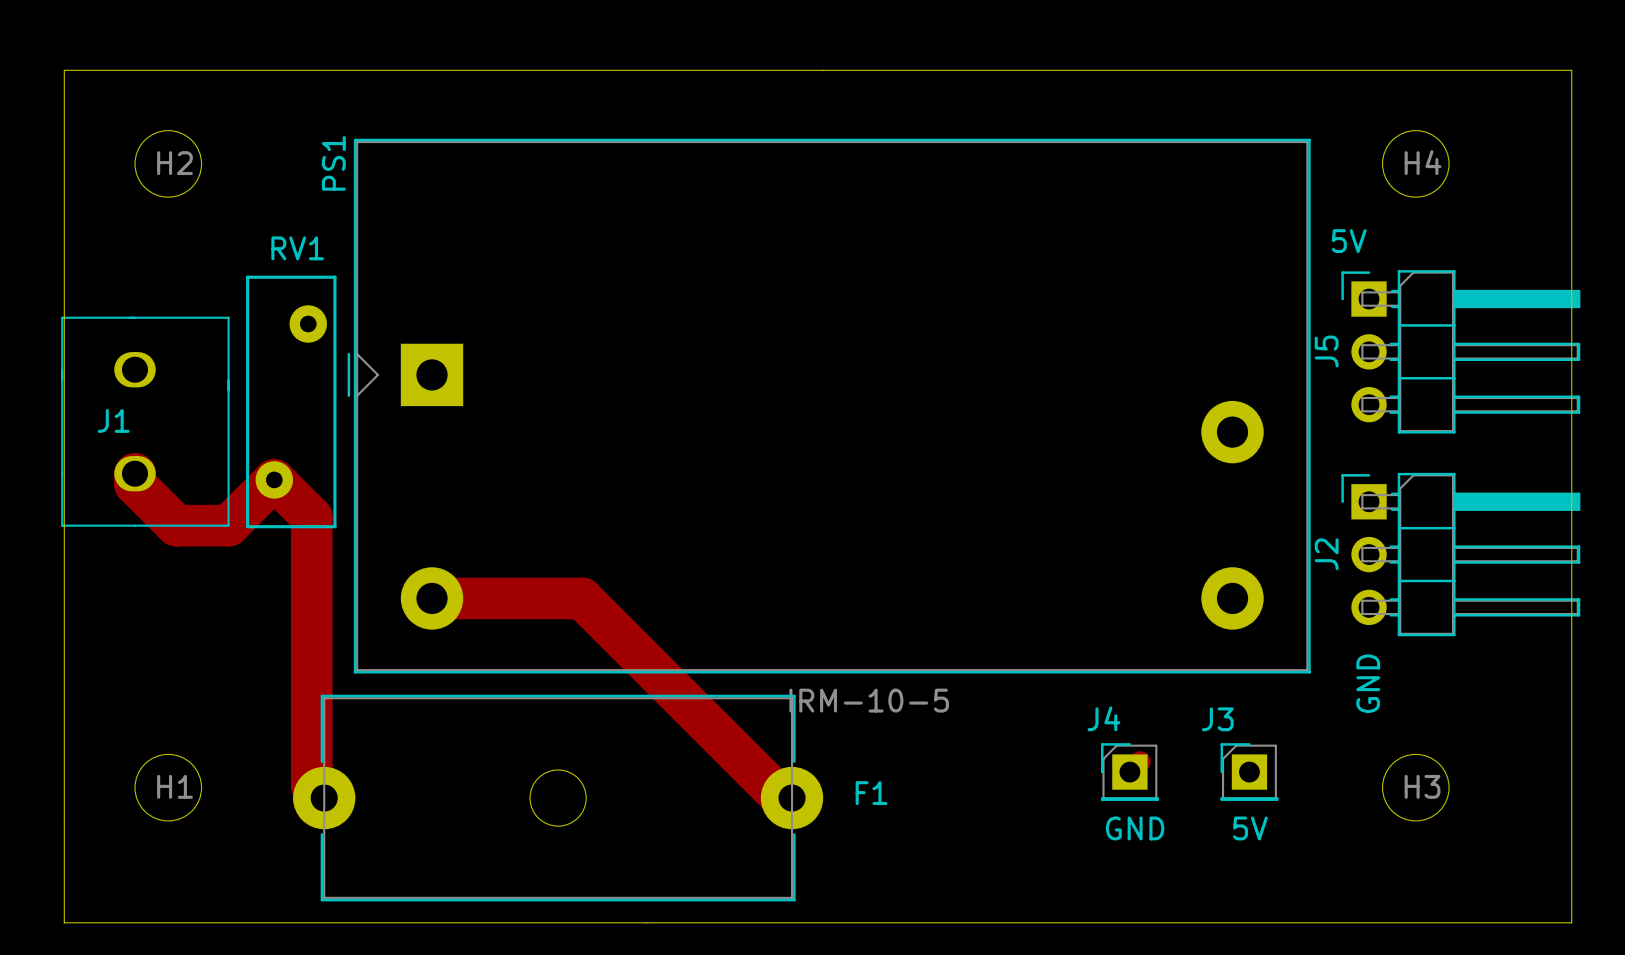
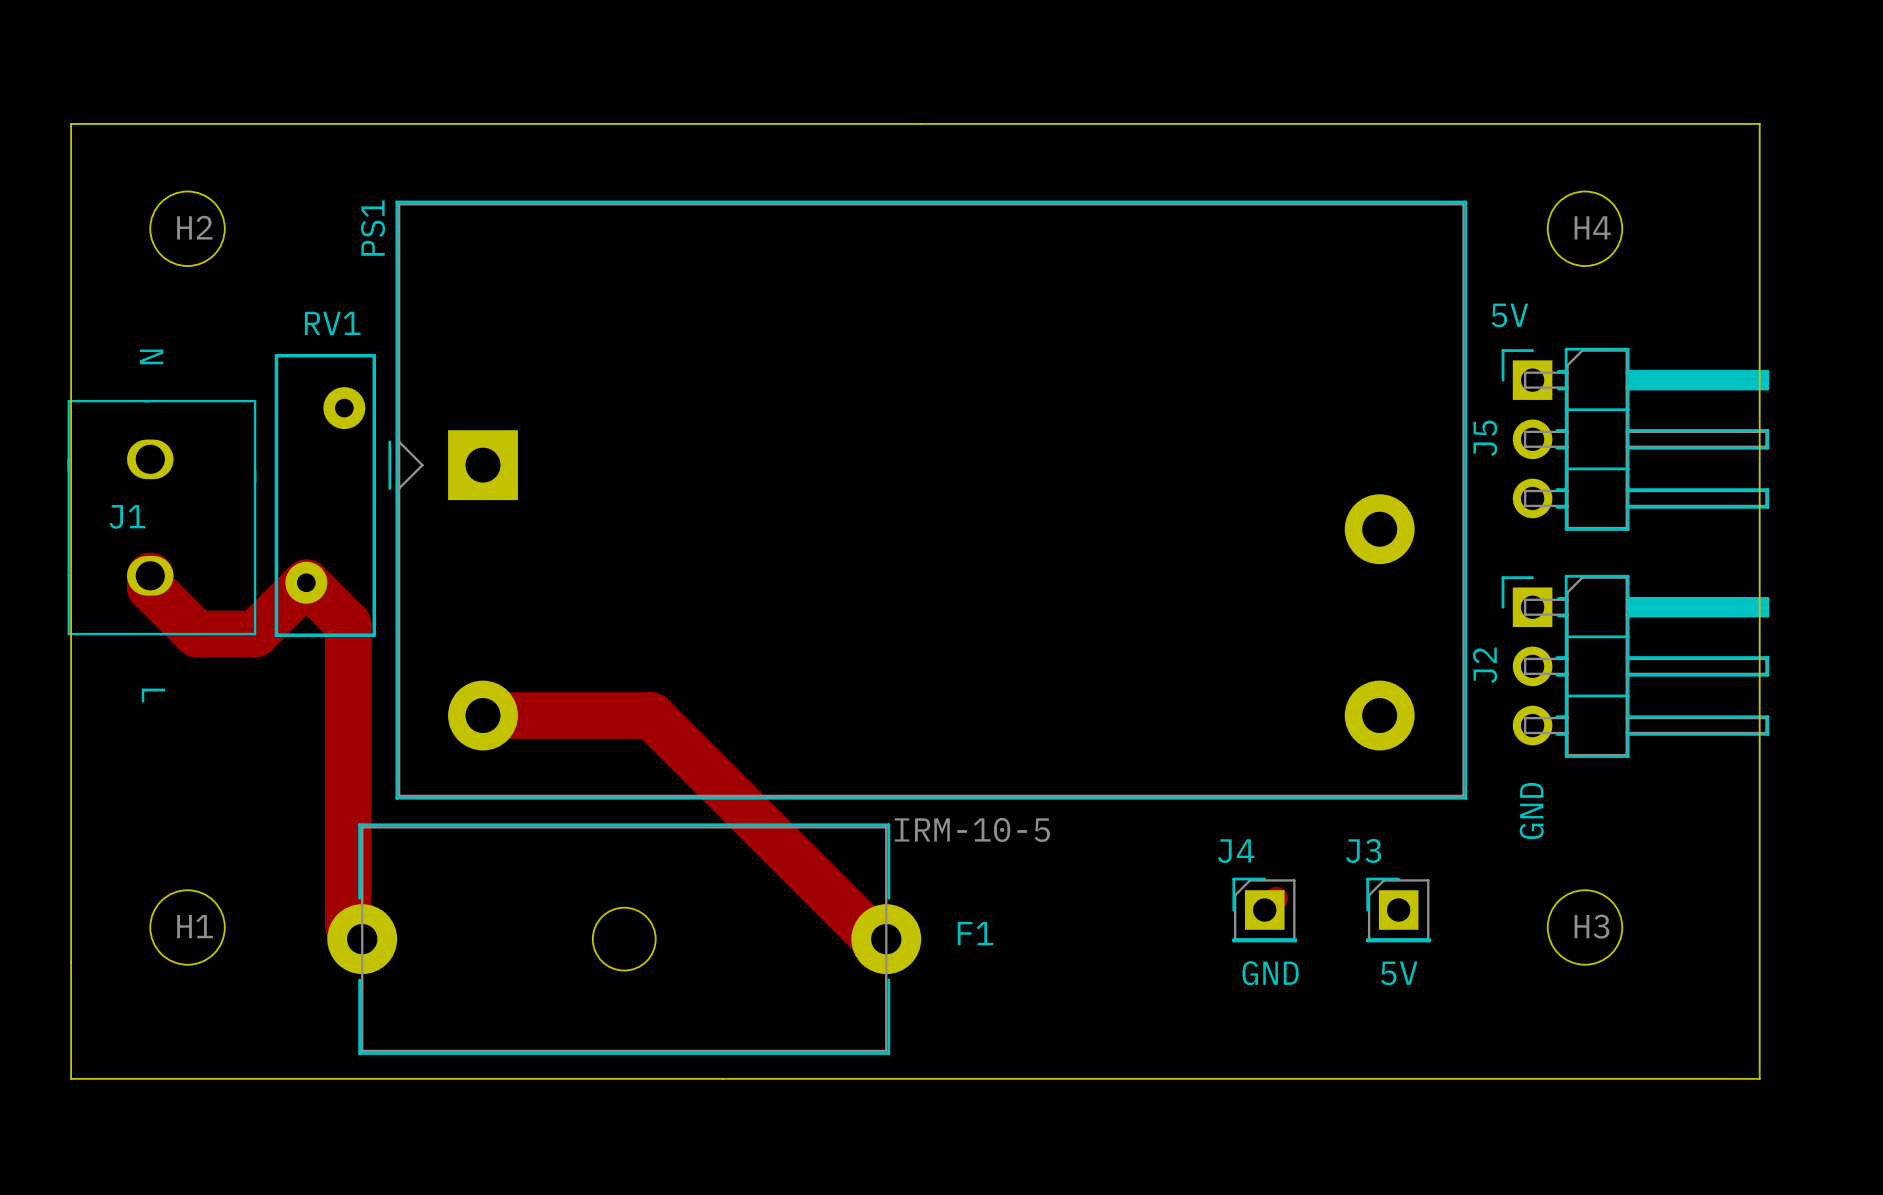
text: none -> N (151, 356)
text: none -> L (153, 695)

